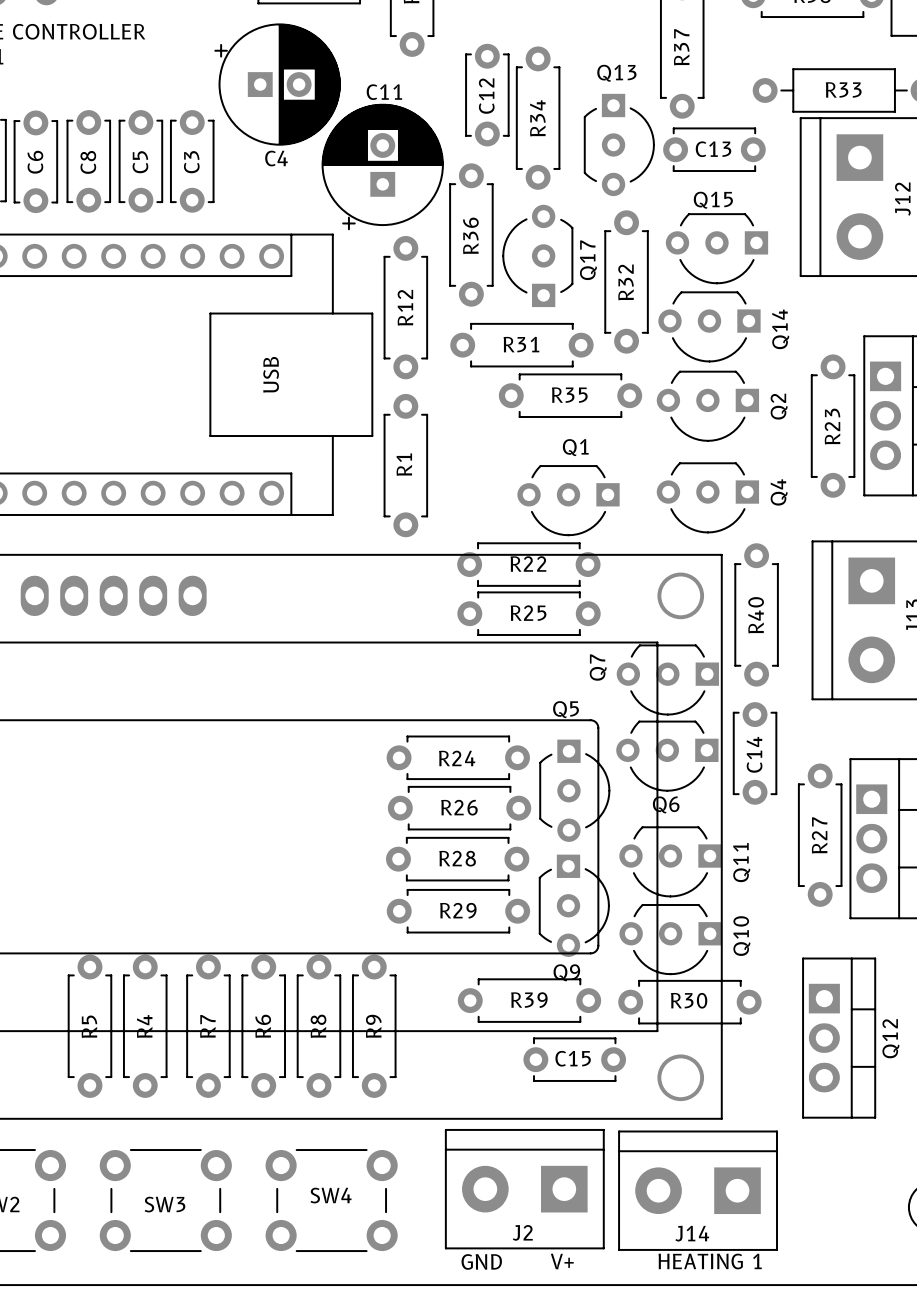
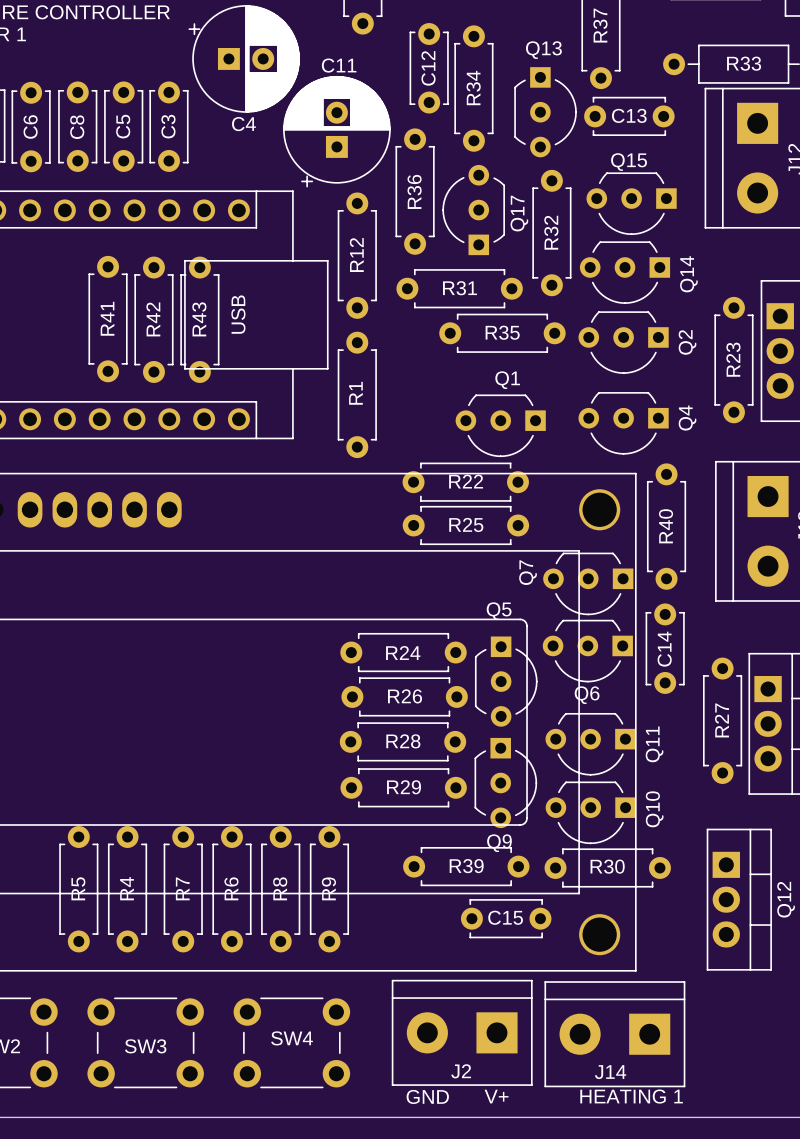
R41: none -> (108, 319)
R42: none -> (153, 319)
R43: none -> (199, 319)

